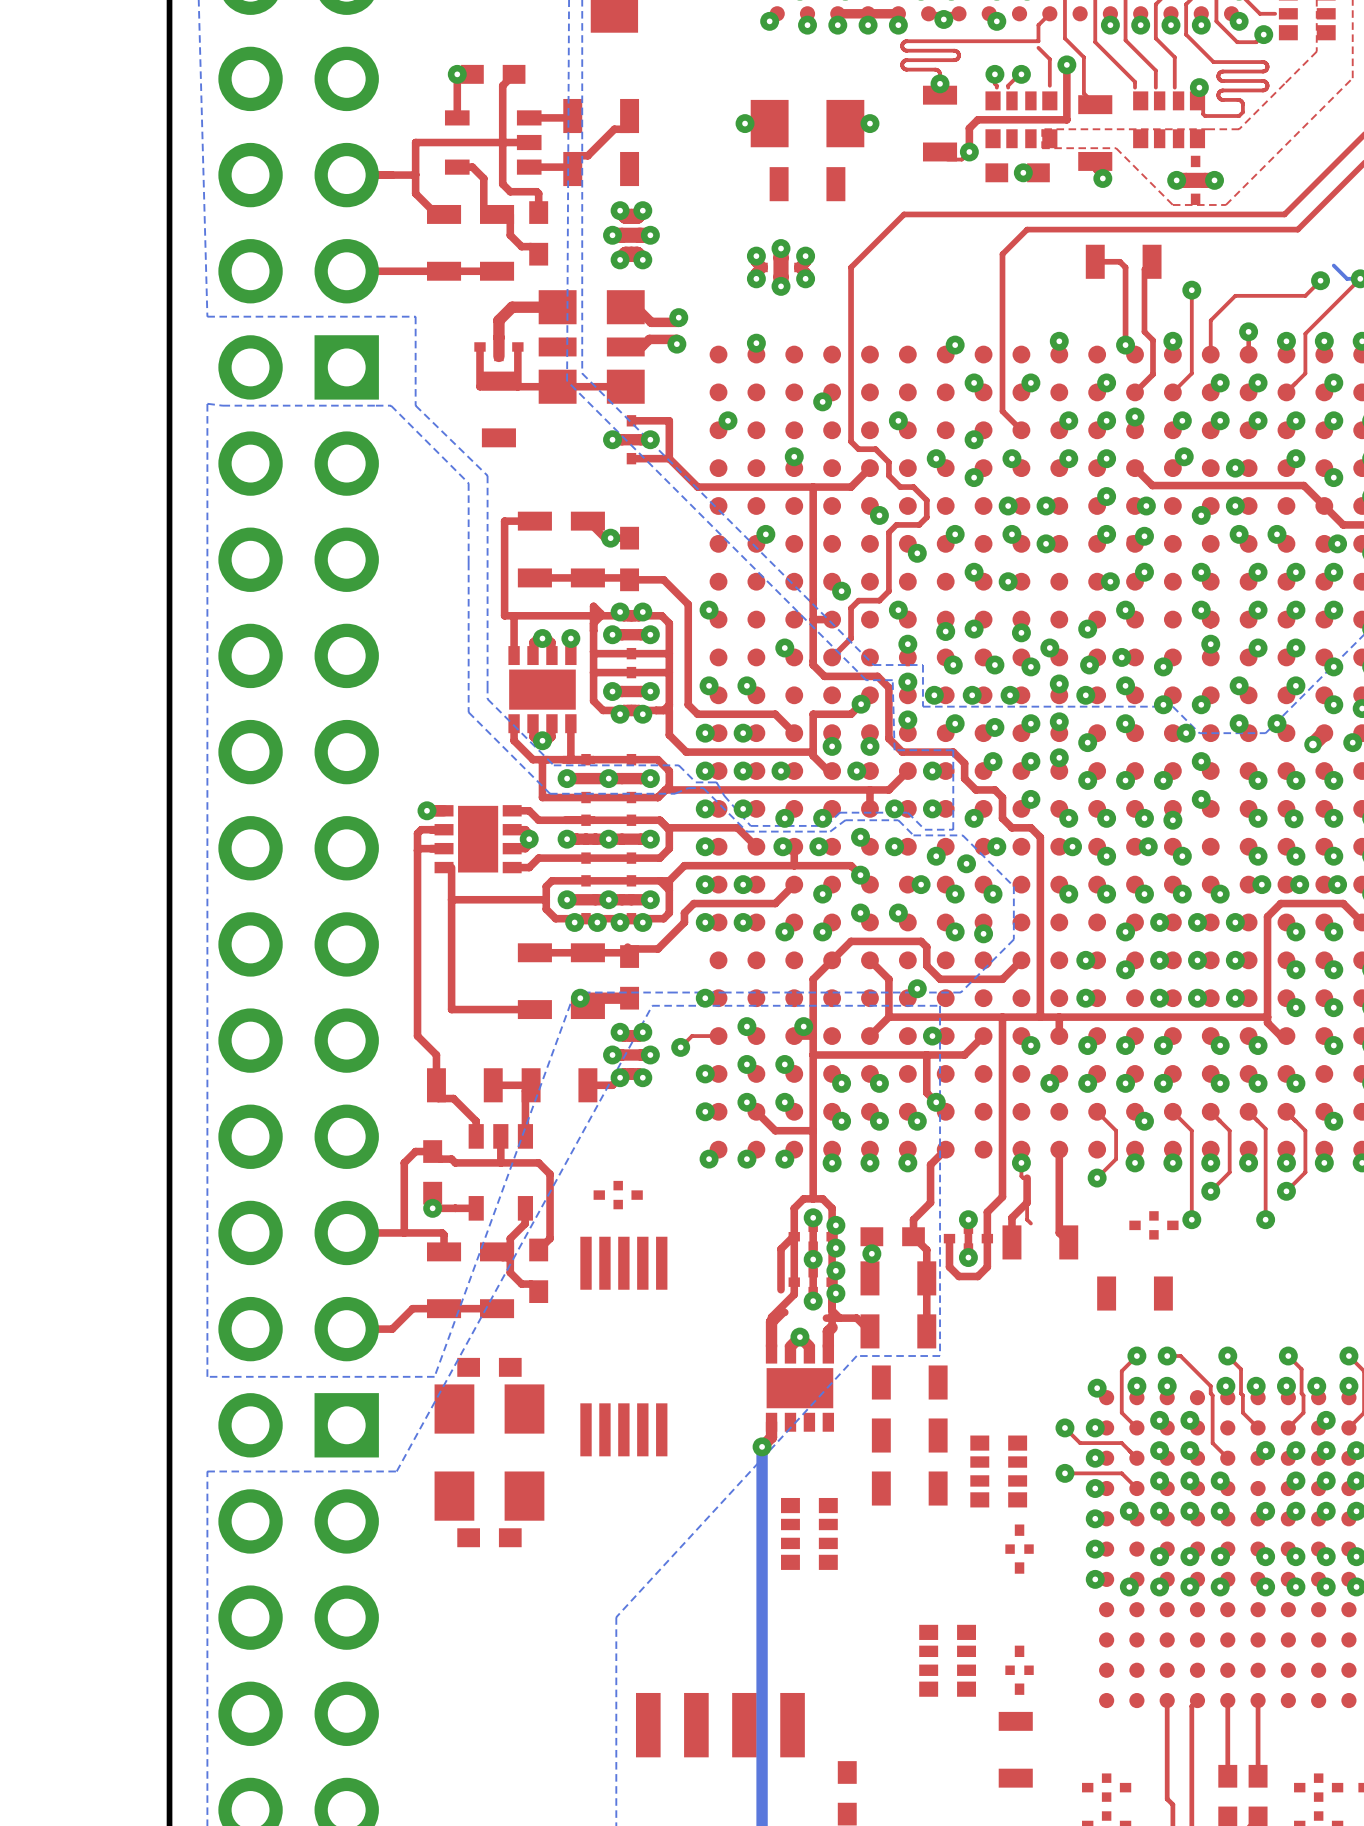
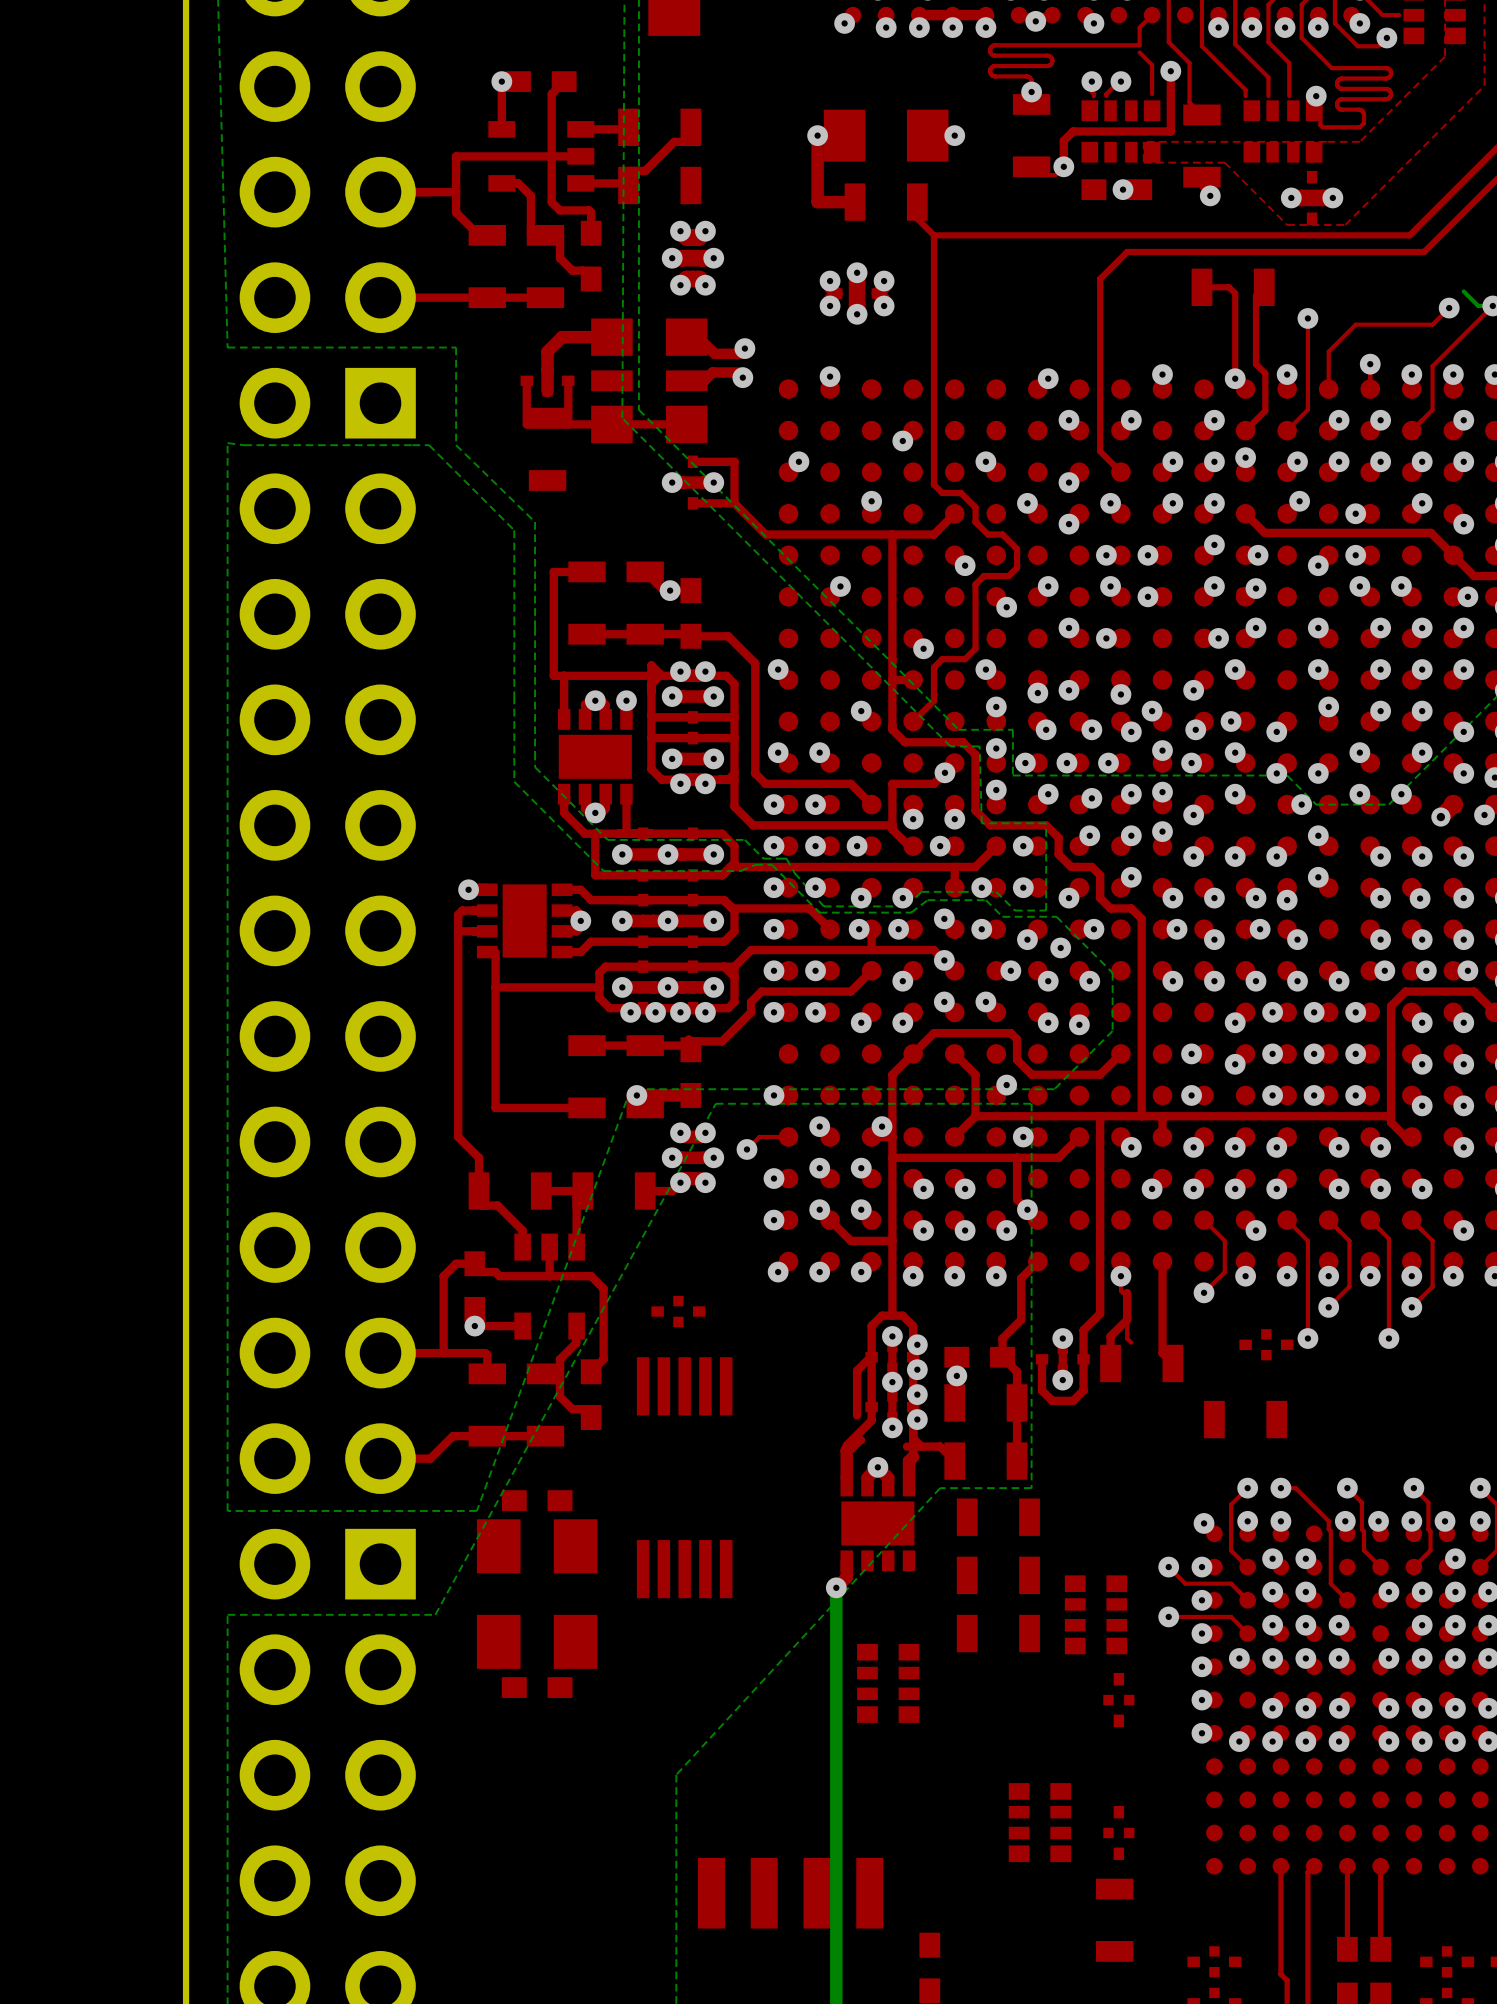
top track: none -> (817, 135) (817, 202) (855, 202)
top track: none -> (917, 202) (917, 218) (933, 235)
top track: none -> (933, 235) (933, 293)
top track: (904, 214) (851, 267) -> (992, 235) (933, 235)

